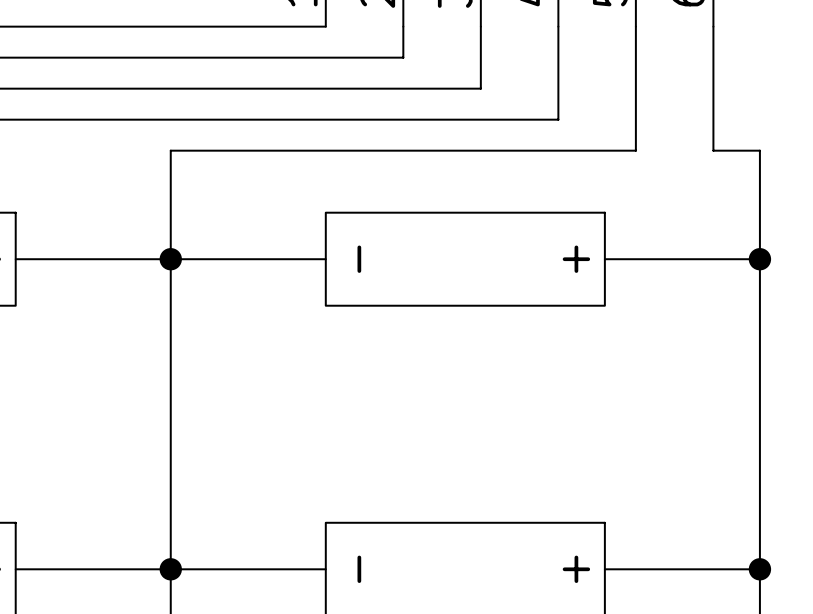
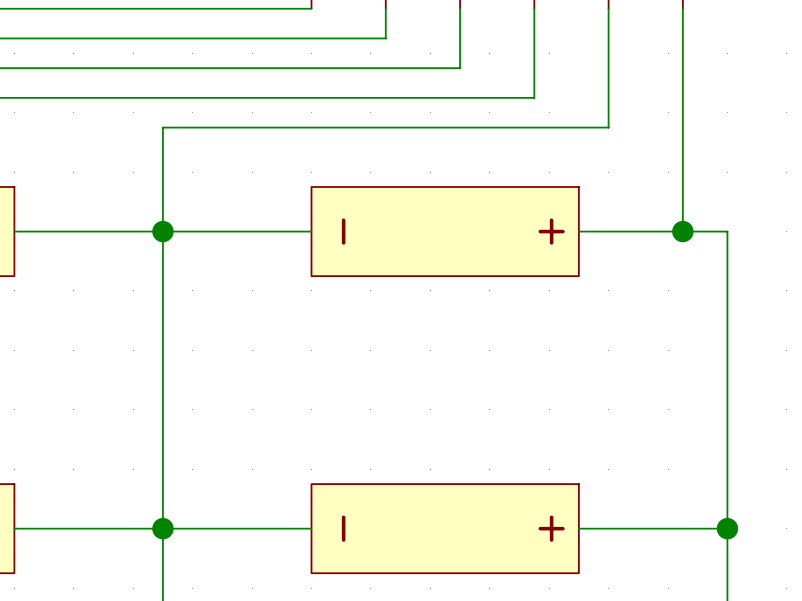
wire: (713, 150) (759, 150) (759, 259) -> (682, 127) (682, 231)
junction position: (759, 259) -> (682, 231)

